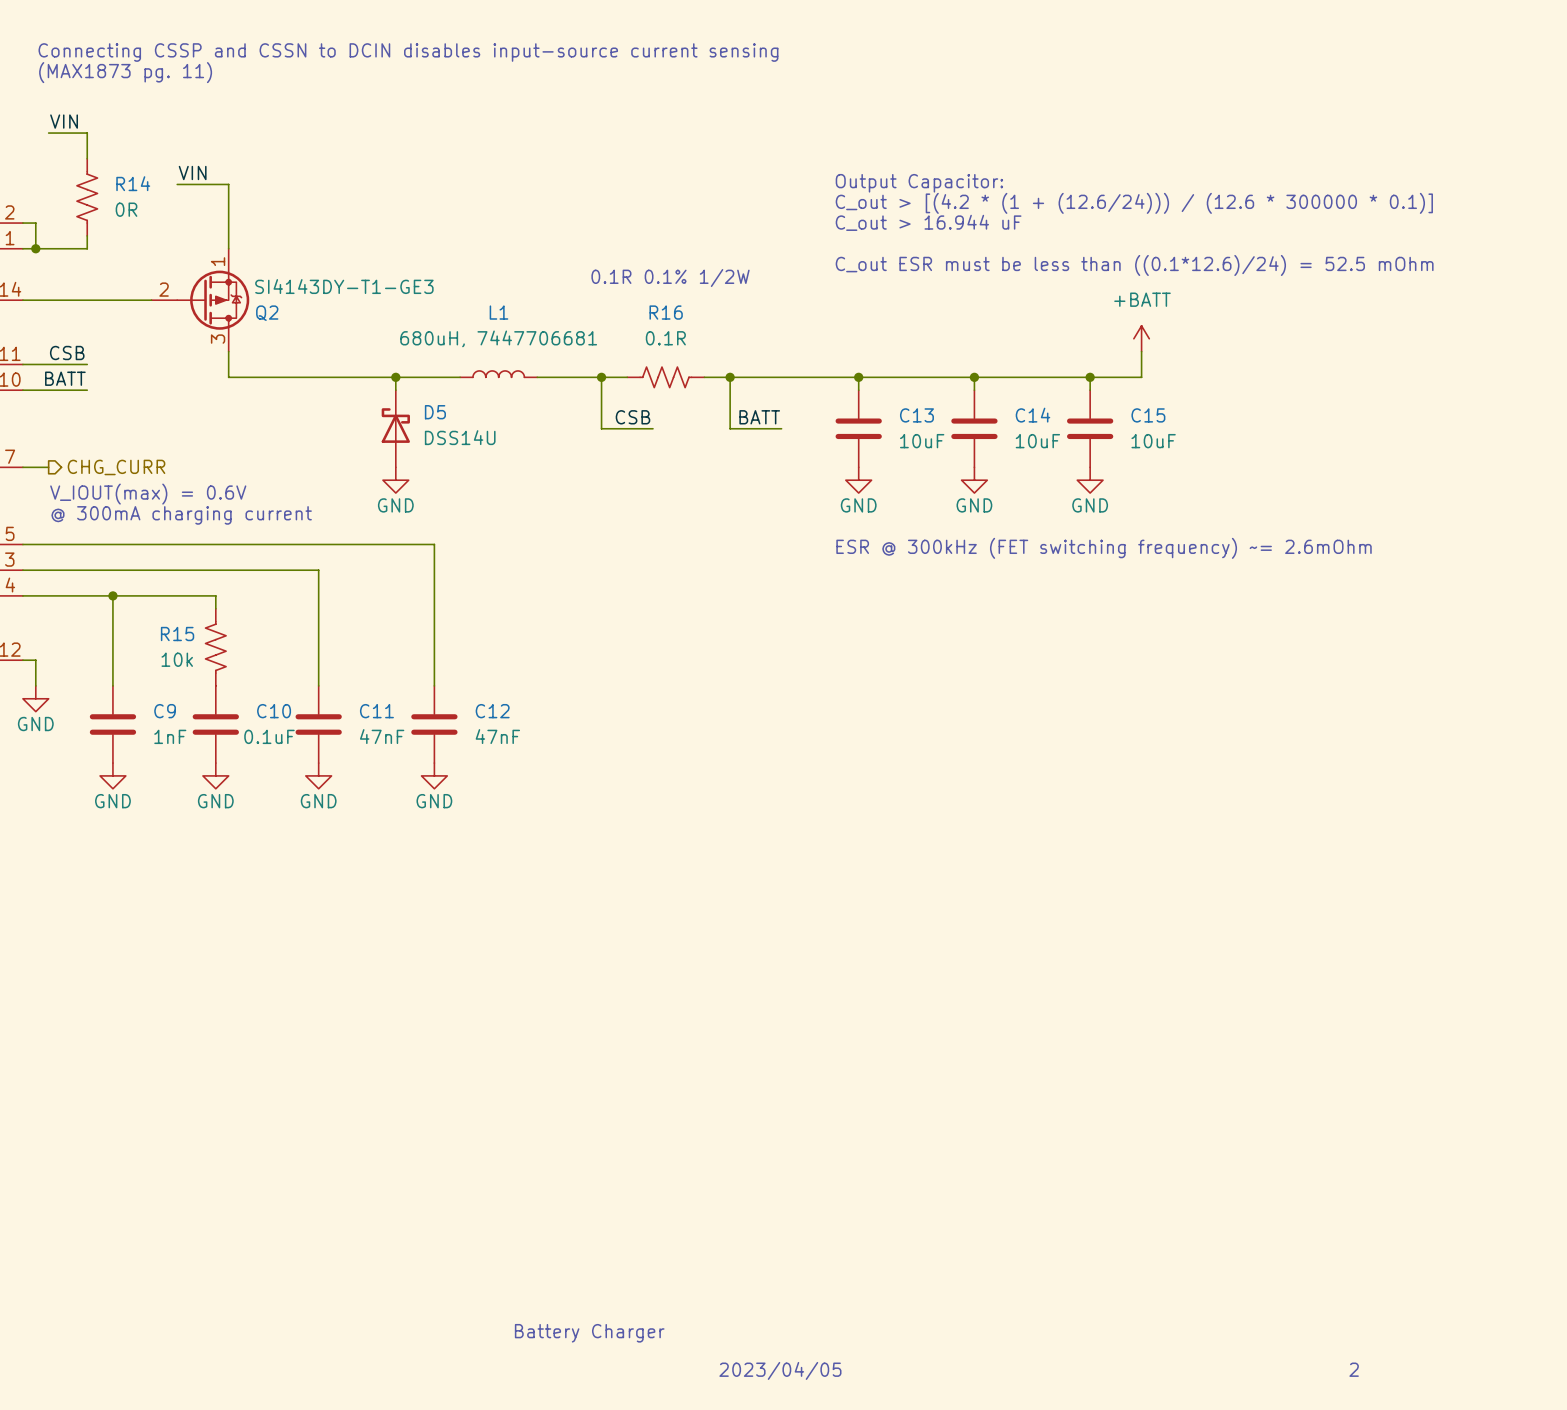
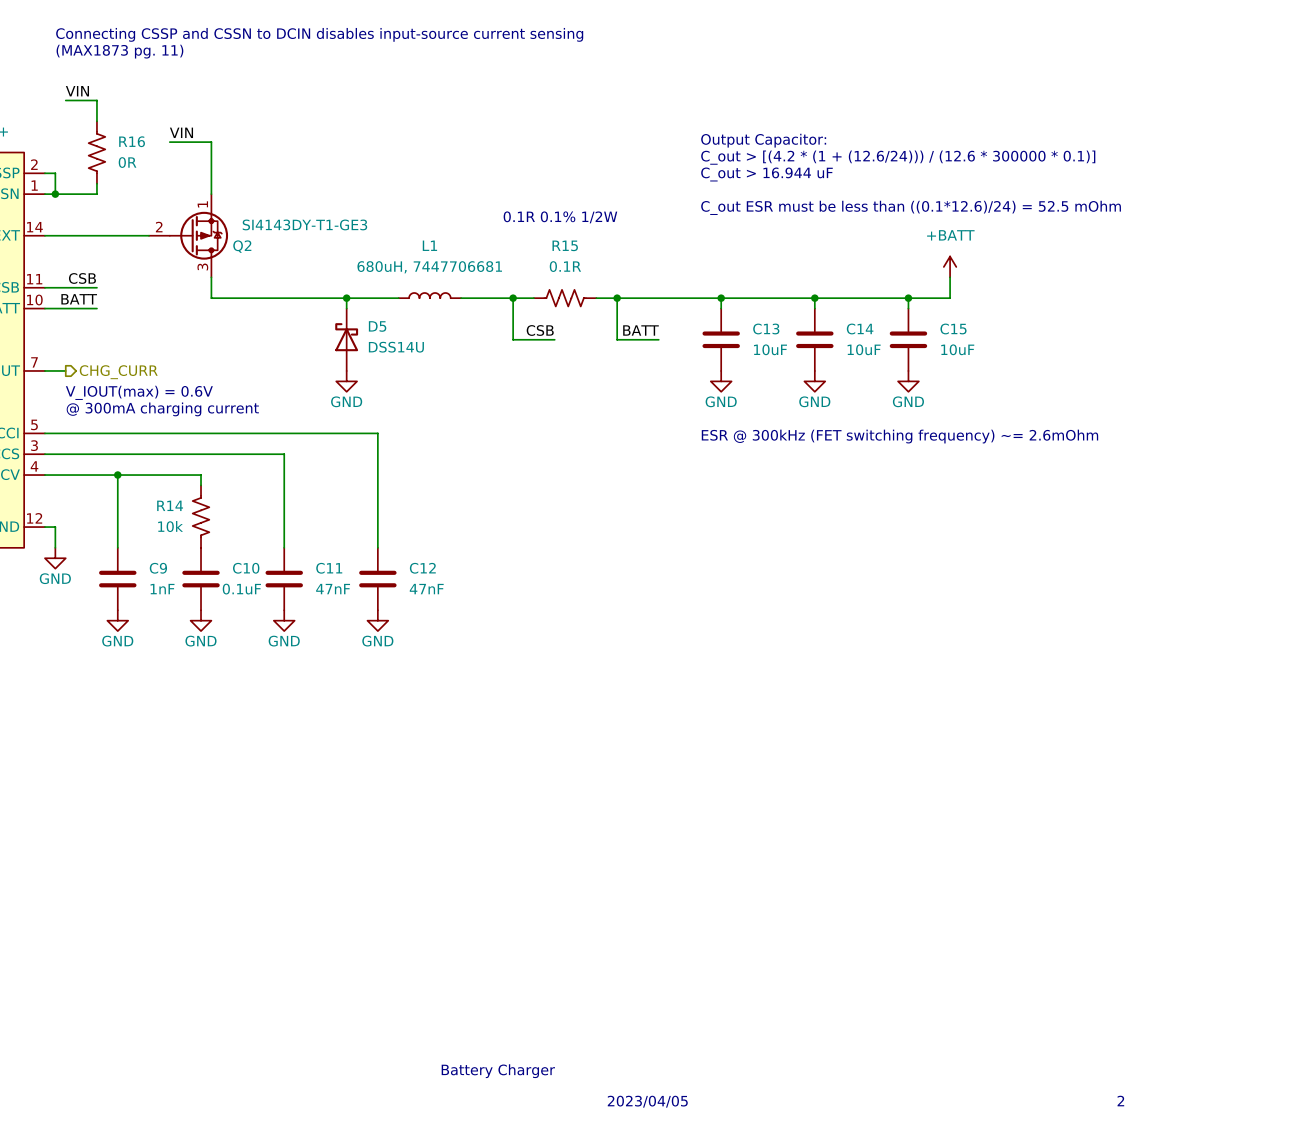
R14 name: R14 (133, 183) -> R16 (132, 141)
R16 name: R16 (666, 312) -> R15 (565, 245)
R15 name: R15 (177, 634) -> R14 (170, 505)

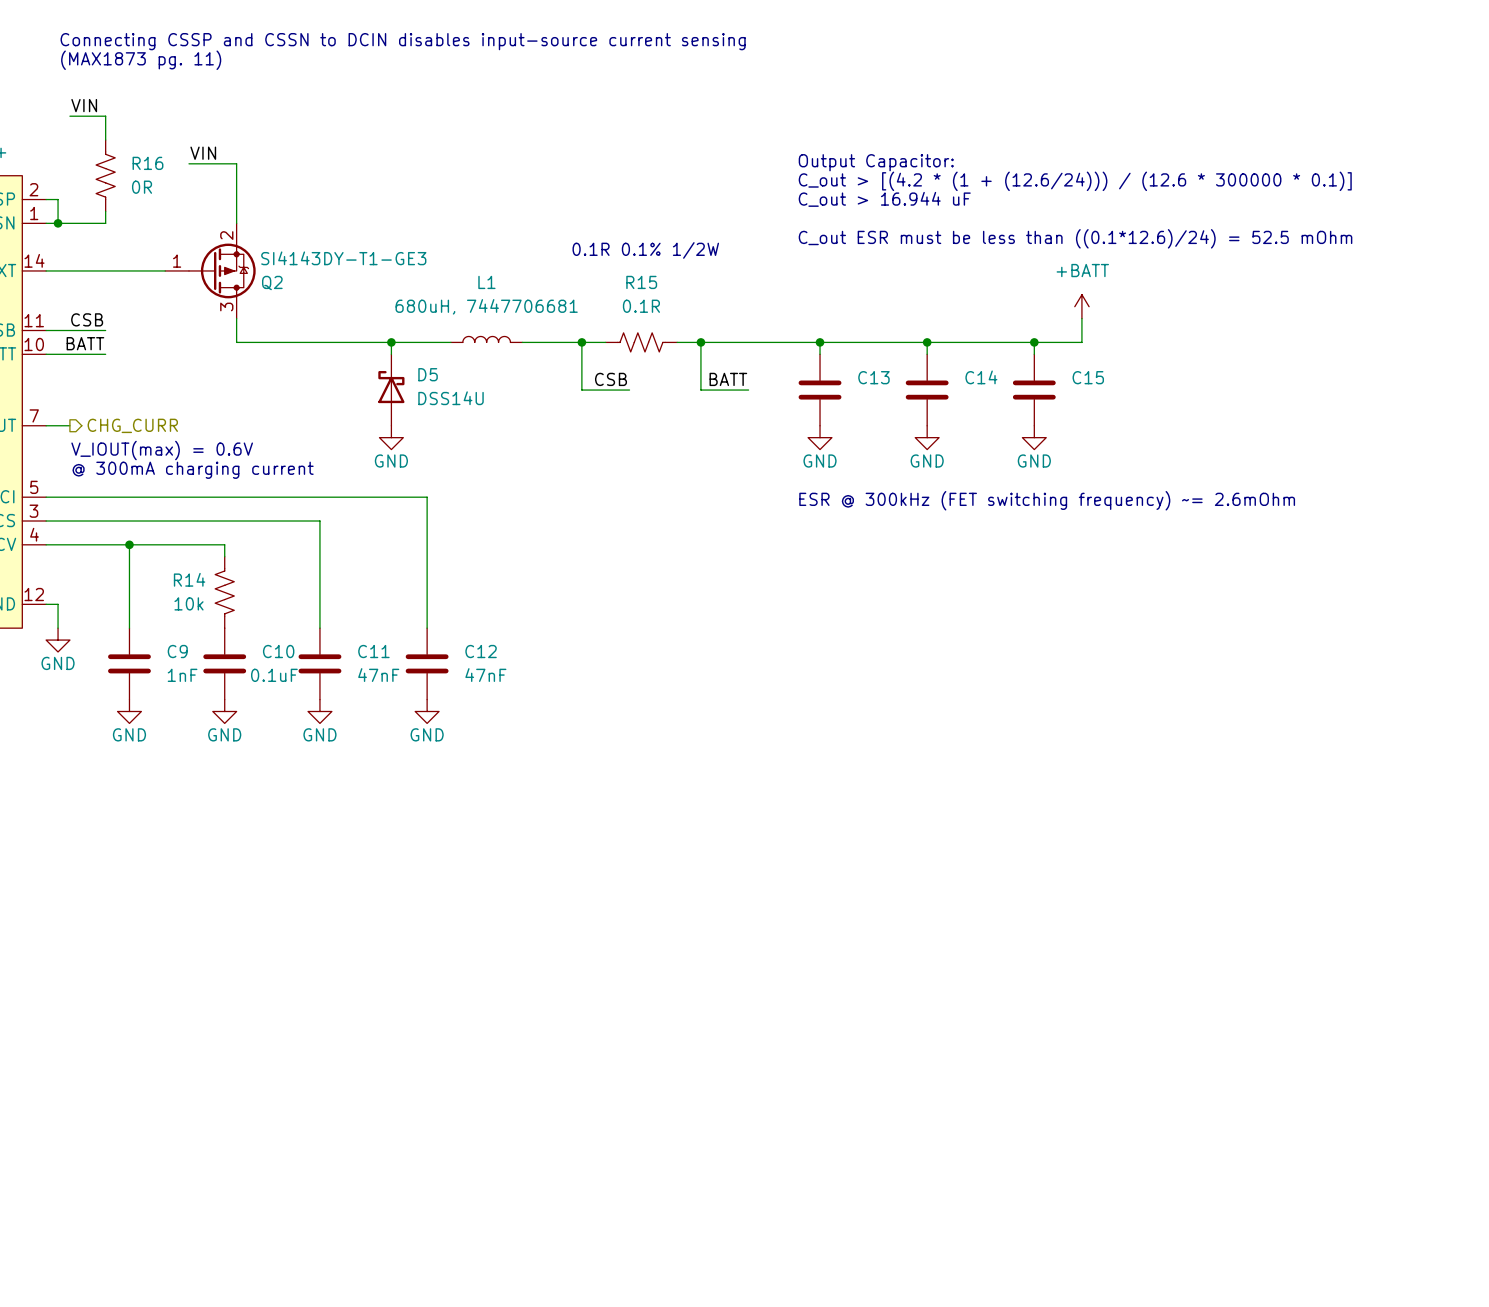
Q2 pin number: 1 (202, 204) -> 2 (226, 235)
Q2 pin number: 2 (159, 227) -> 1 (177, 261)
C13 value: 10uF (770, 349) -> none
C14 value: 10uF (864, 349) -> none
C15 value: 10uF (957, 349) -> none
text: Battery Charger (498, 1071) -> none
text: 2023/04/05 (647, 1101) -> none
text: 2 (1120, 1101) -> none

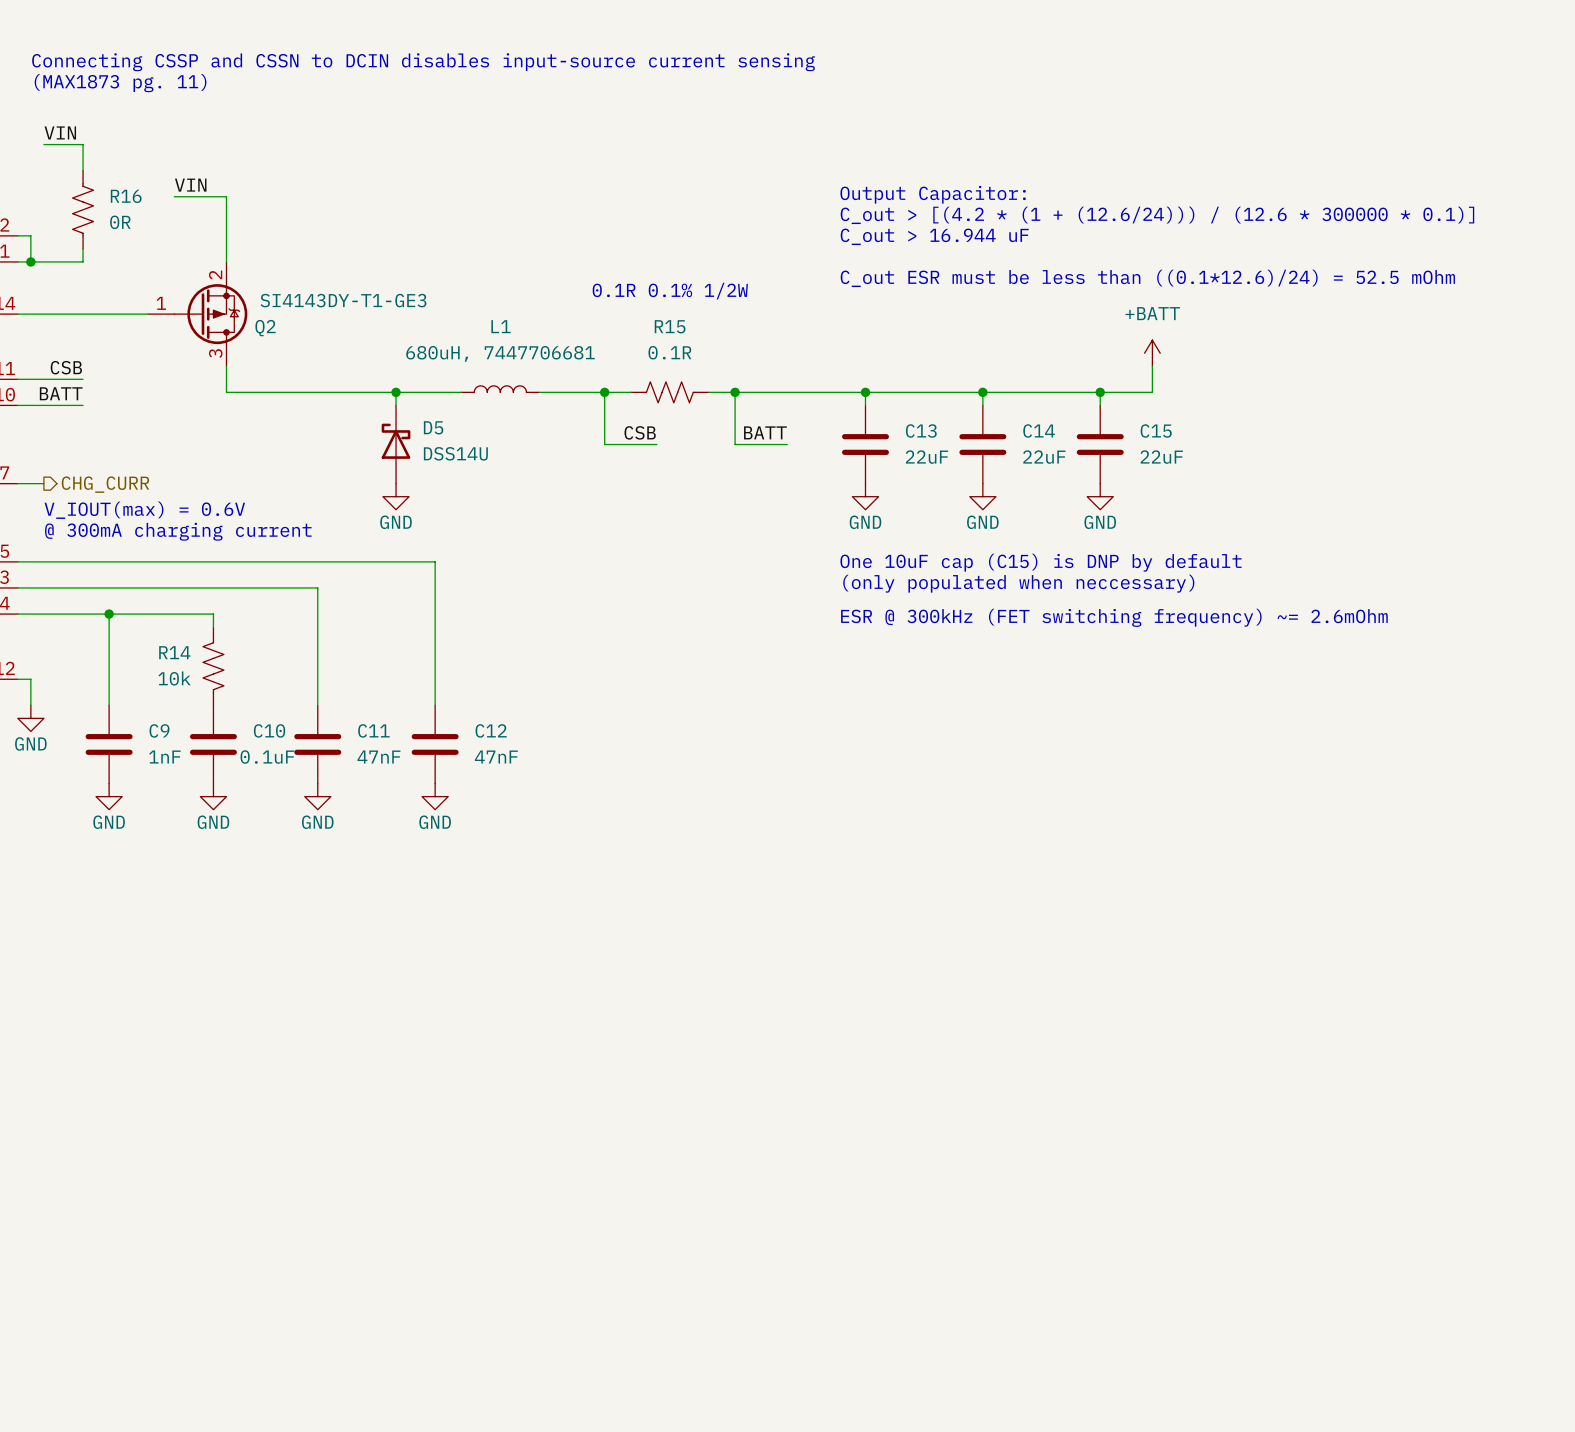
C13 value: none -> 22uF (926, 457)
C14 value: none -> 22uF (1044, 457)
C15 value: none -> 22uF (1161, 457)
text: ESR @ 300kHz (FET switching frequency) ~= 2.6mOhm (1047, 500) -> One 10uF cap (C15) is DNP by default (1041, 562)
text: none -> (only populated when neccessary) (1018, 583)
text: none -> ESR @ 300kHz (FET switching frequency) ~= 2.6mOhm (1114, 617)

